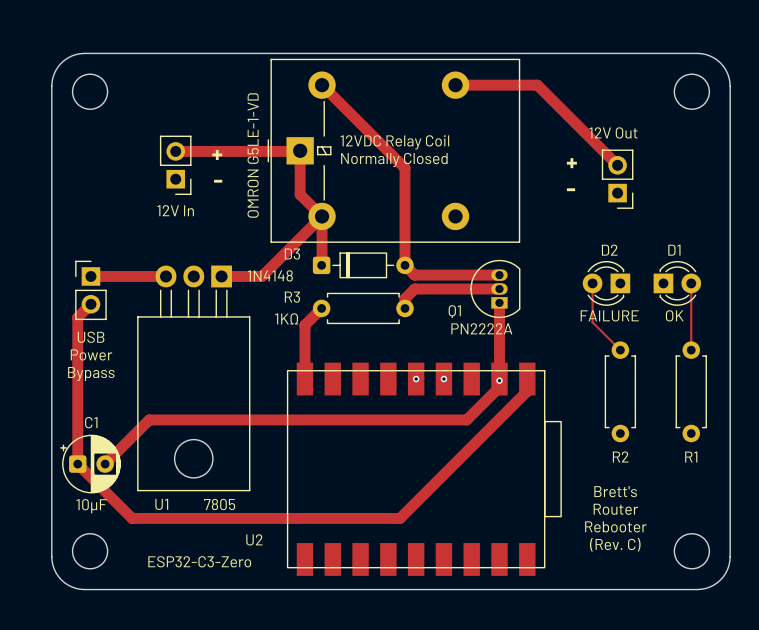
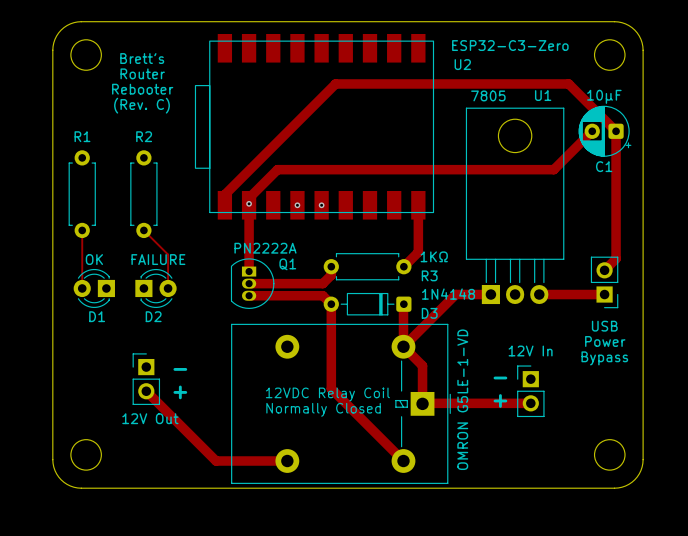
track: (322, 85) (405, 168) (405, 265) (414, 275) (499, 275) -> none
track: (455, 85) (537, 85) (617, 165) -> none
text: none -> Brett's (142, 58)
text: none -> Router (142, 73)
text: none -> Rebooter (142, 89)
text: none -> 7805 (488, 95)
text: 12VDC Relay Coil (394, 142) -> none
text: none -> (Rev. C) (141, 105)
part: OMRON G5LE-1-VD (393, 150) -> none
track: (175, 151) (300, 150) (300, 194) (322, 216) -> none
text: + (217, 154) -> none
text: Normally Closed (394, 160) -> none
text: + (571, 163) -> none
part: 12V In (175, 165) -> none
part: 12V Out (617, 179) -> none
track: none -> (592, 131) (553, 169) (277, 169) (249, 198) (249, 271)
text: - (218, 181) -> none
text: - (570, 189) -> none
track: (322, 216) (321, 265) -> none
track: (322, 216) (262, 276) (221, 276) -> none
via: none -> (249, 203)
track: none -> (224, 205) (224, 194) (335, 83) (568, 83) (616, 131) (616, 258) (604, 270)
via: none -> (297, 205)
via: none -> (321, 205)
track: none -> (418, 205) (418, 252) (403, 266)
D3 rotation: 0° (363, 265) -> 180° (367, 304)
D3 position: (363, 265) -> (367, 304)
track: (90, 276) (165, 276) -> none
track: (592, 283) (592, 322) (620, 350) -> none
D2 rotation: 0° (606, 283) -> 180° (155, 288)
D2 position: (606, 283) -> (155, 288)
D1 rotation: 0° (677, 283) -> 180° (94, 288)
D1 position: (677, 283) -> (94, 288)
track: (691, 283) (691, 350) -> none
Q1 rotation: 0° (495, 288) -> 180° (252, 283)
Q1 position: (495, 288) -> (252, 283)
track: (499, 288) (414, 288) (405, 298) (405, 308) -> none
part: (90, 290) -> none
track: none -> (82, 230) (82, 288)
track: none -> (143, 230) (168, 254) (168, 288)
R3 name position: R3 (292, 297) -> R3 (429, 275)
track: (499, 302) (499, 379) -> none
track: (90, 304) (77, 317) (77, 464) (132, 518) (400, 518) (527, 391) (527, 379) -> none
track: (321, 308) (304, 325) (304, 379) -> none
R3 position: (363, 308) -> (367, 266)
R3 value position: 1KΩ (286, 318) -> 1KΩ (434, 256)
track: none -> (331, 266) (331, 275) (322, 283) (249, 283)
text: USB (91, 337) -> none
part: none -> (604, 282)
text: Power (91, 354) -> none
track: none -> (490, 294) (455, 294) (403, 346)
track: none -> (539, 294) (604, 294)
track: none -> (249, 295) (322, 295) (331, 304) (331, 388) (403, 461)
text: Bypass (91, 374) -> none
U1 rotation: 0° (193, 378) -> 180° (515, 205)
U1 position: (193, 378) -> (515, 205)
track: none -> (403, 304) (403, 346)
via: (416, 379) -> none
via: (443, 379) -> none
track: (499, 379) (499, 387) (466, 419) (149, 419) (105, 464) -> none
via: (499, 380) -> none
R2 position: (620, 391) -> (143, 194)
R1 position: (691, 391) -> (82, 194)
text: none -> USB (604, 326)
text: none -> Power (605, 341)
track: none -> (403, 346) (422, 365) (422, 403) (530, 403)
text: none -> Bypass (604, 358)
text: none -> - (180, 369)
R2 name position: R2 (620, 456) -> R2 (144, 136)
R1 name position: R1 (691, 457) -> R1 (82, 136)
text: none -> - (500, 378)
C1 rotation: 0° (90, 464) -> 180° (605, 131)
C1 position: (90, 464) -> (605, 131)
part: none -> 12V Out (146, 379)
U2 rotation: 0° (424, 469) -> 180° (314, 126)
U2 position: (424, 469) -> (314, 126)
track: none -> (146, 391) (216, 461) (287, 461)
part: none -> 12V In (530, 391)
text: none -> + (180, 392)
text: none -> 12VDC Relay Coil (327, 394)
text: none -> + (500, 400)
text: Brett's (615, 491) -> none
part: none -> OMRON G5LE-1-VD (340, 403)
text: none -> Normally Closed (323, 409)
text: 7805 (219, 504) -> none
text: Router (615, 509) -> none
text: Rebooter (615, 526) -> none
text: (Rev. C) (615, 544) -> none

